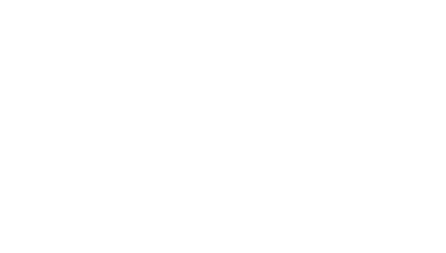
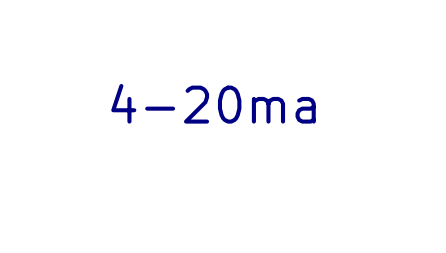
text: none -> 4-20ma (213, 103)

